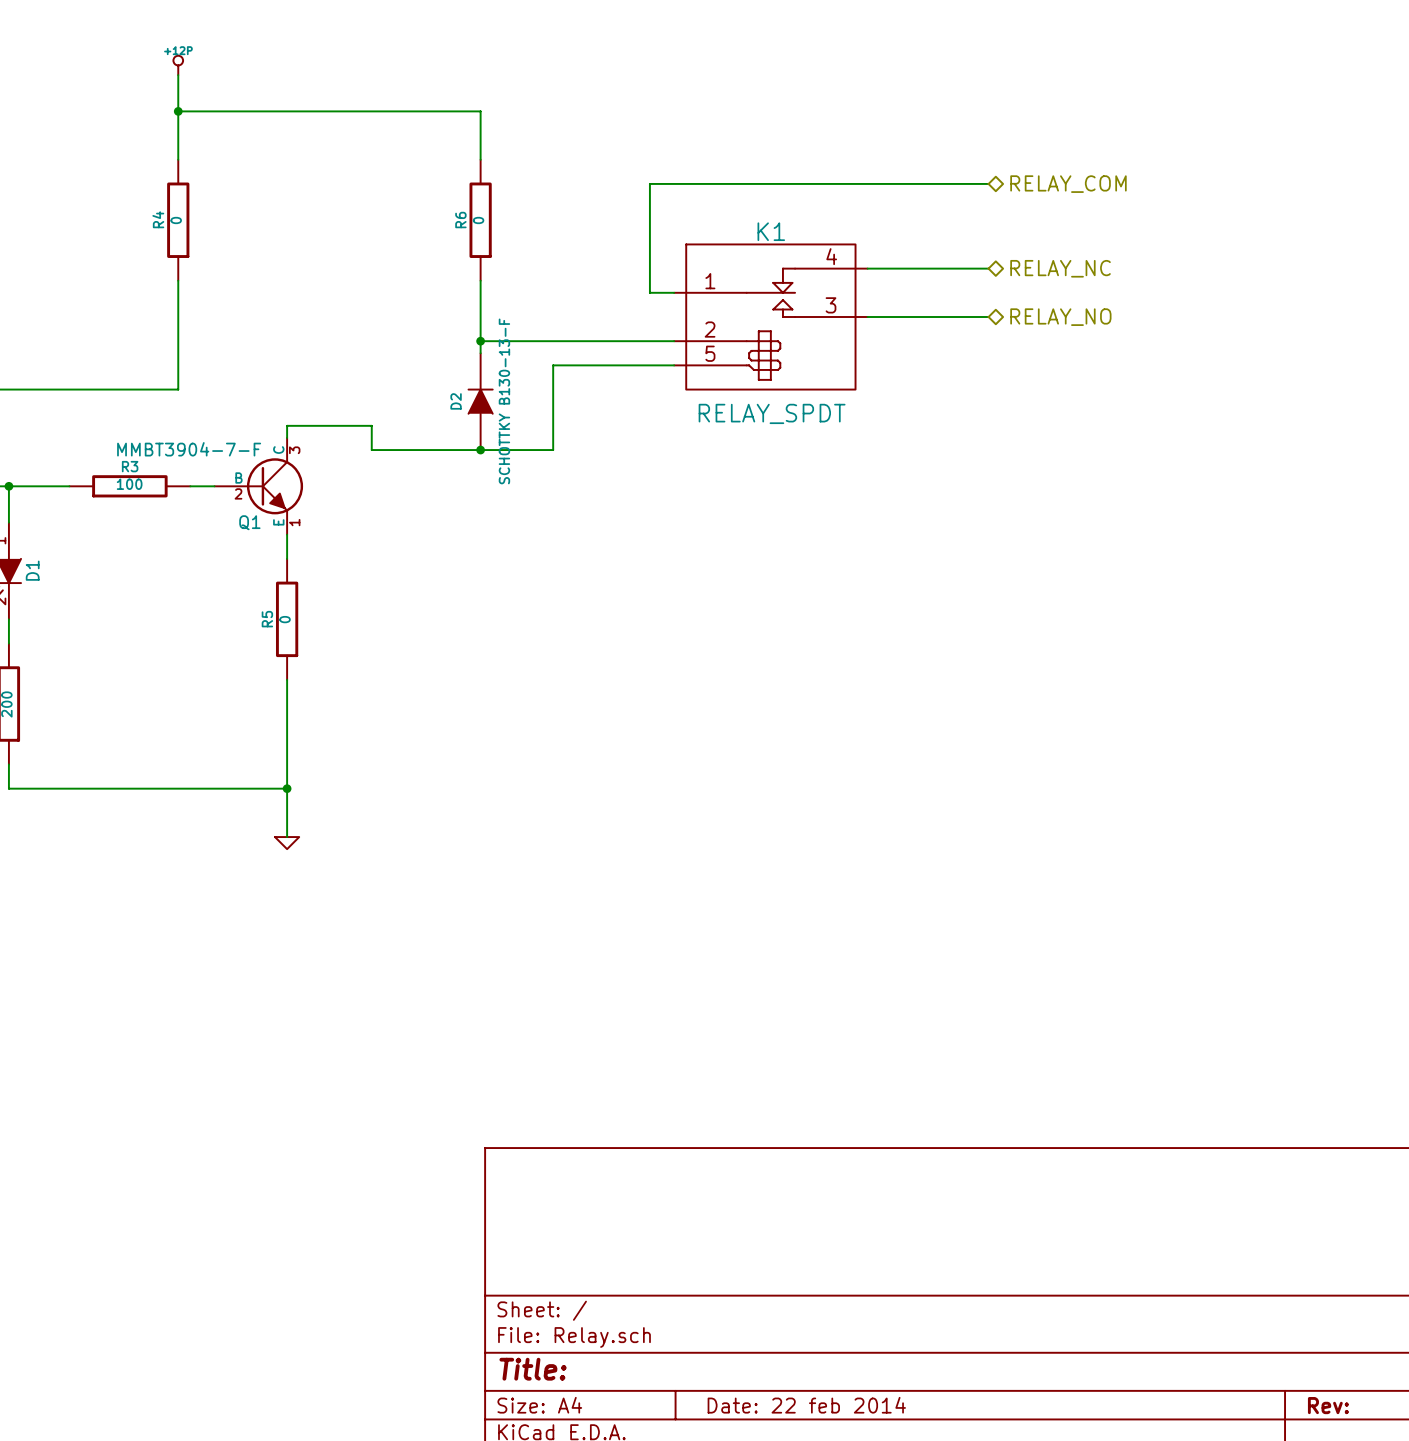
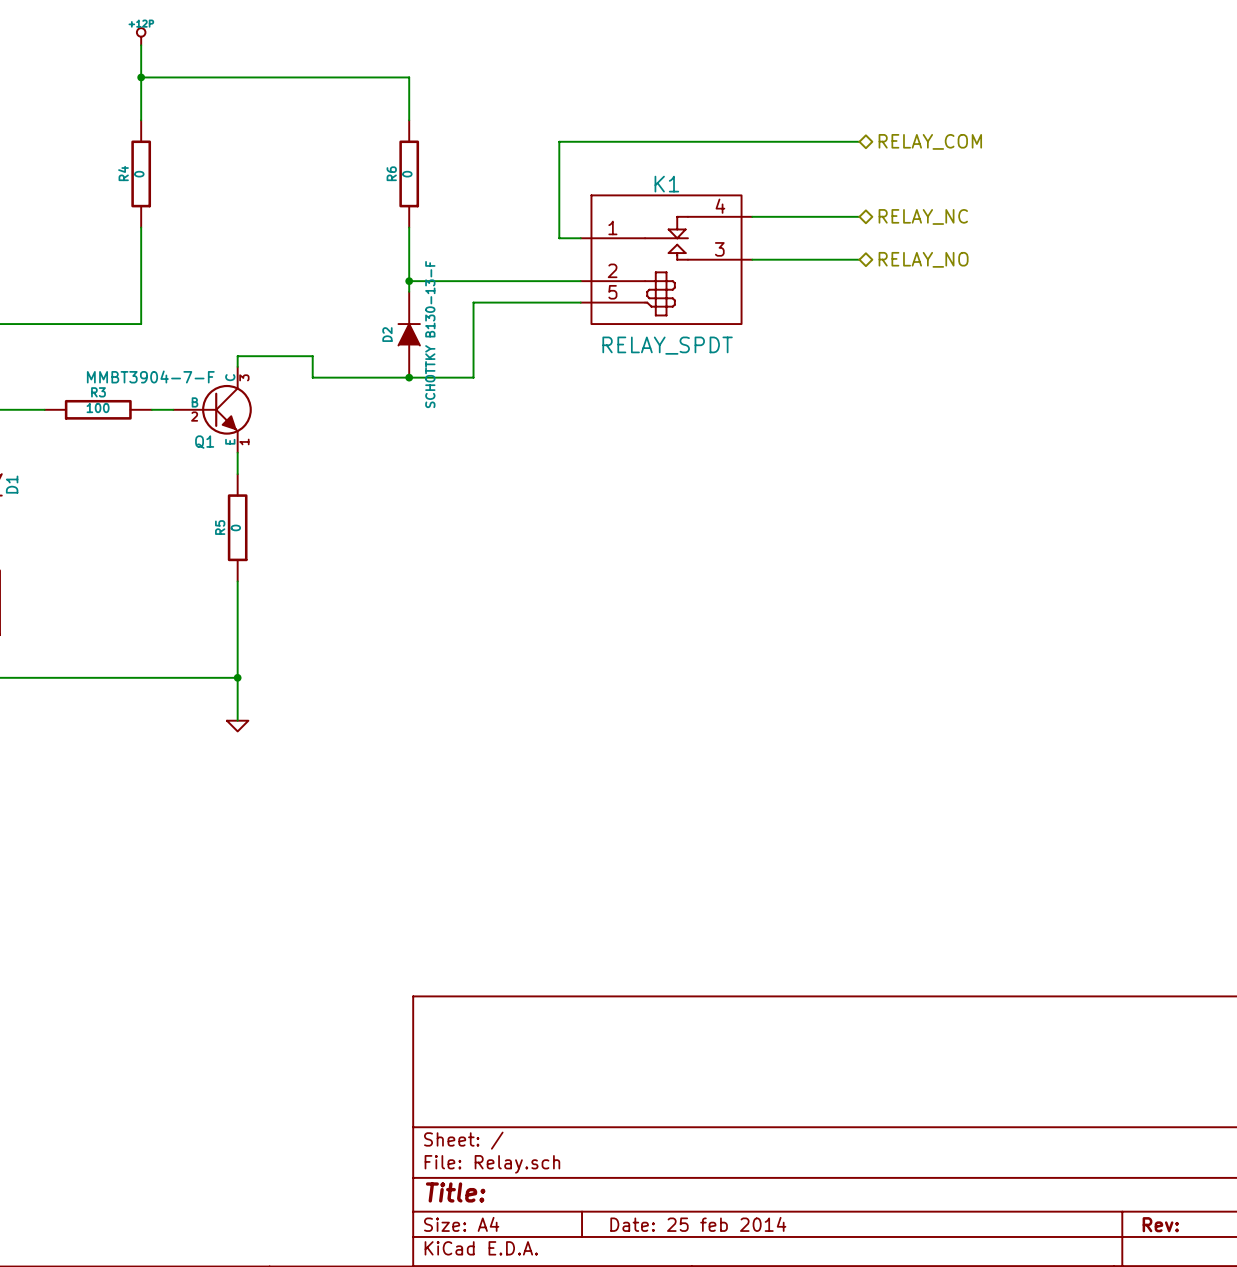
title block: Date: 22 feb 2014 (806, 1405) -> Date: 25 feb 2014 (698, 1224)

